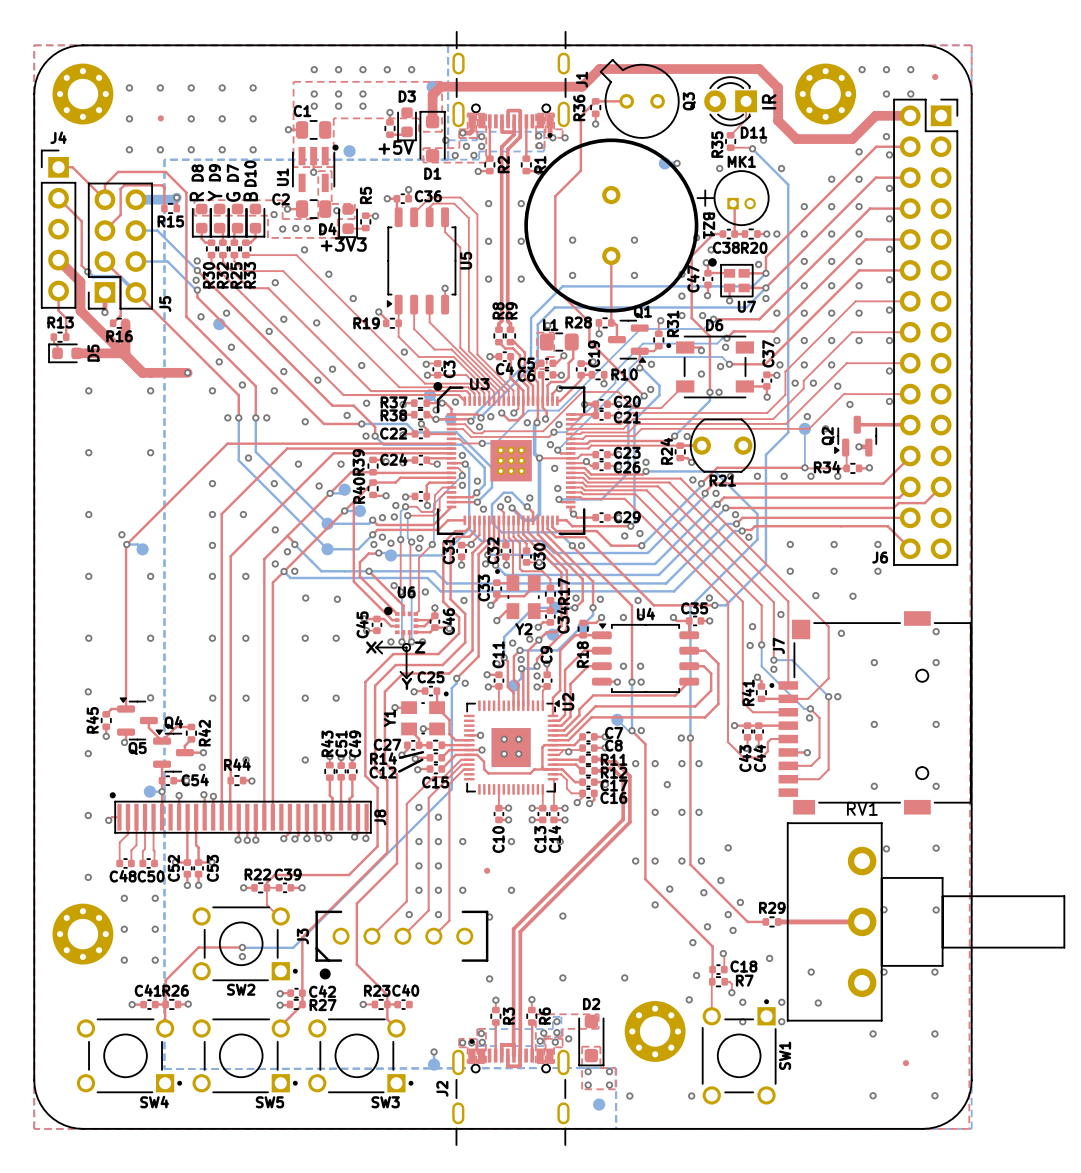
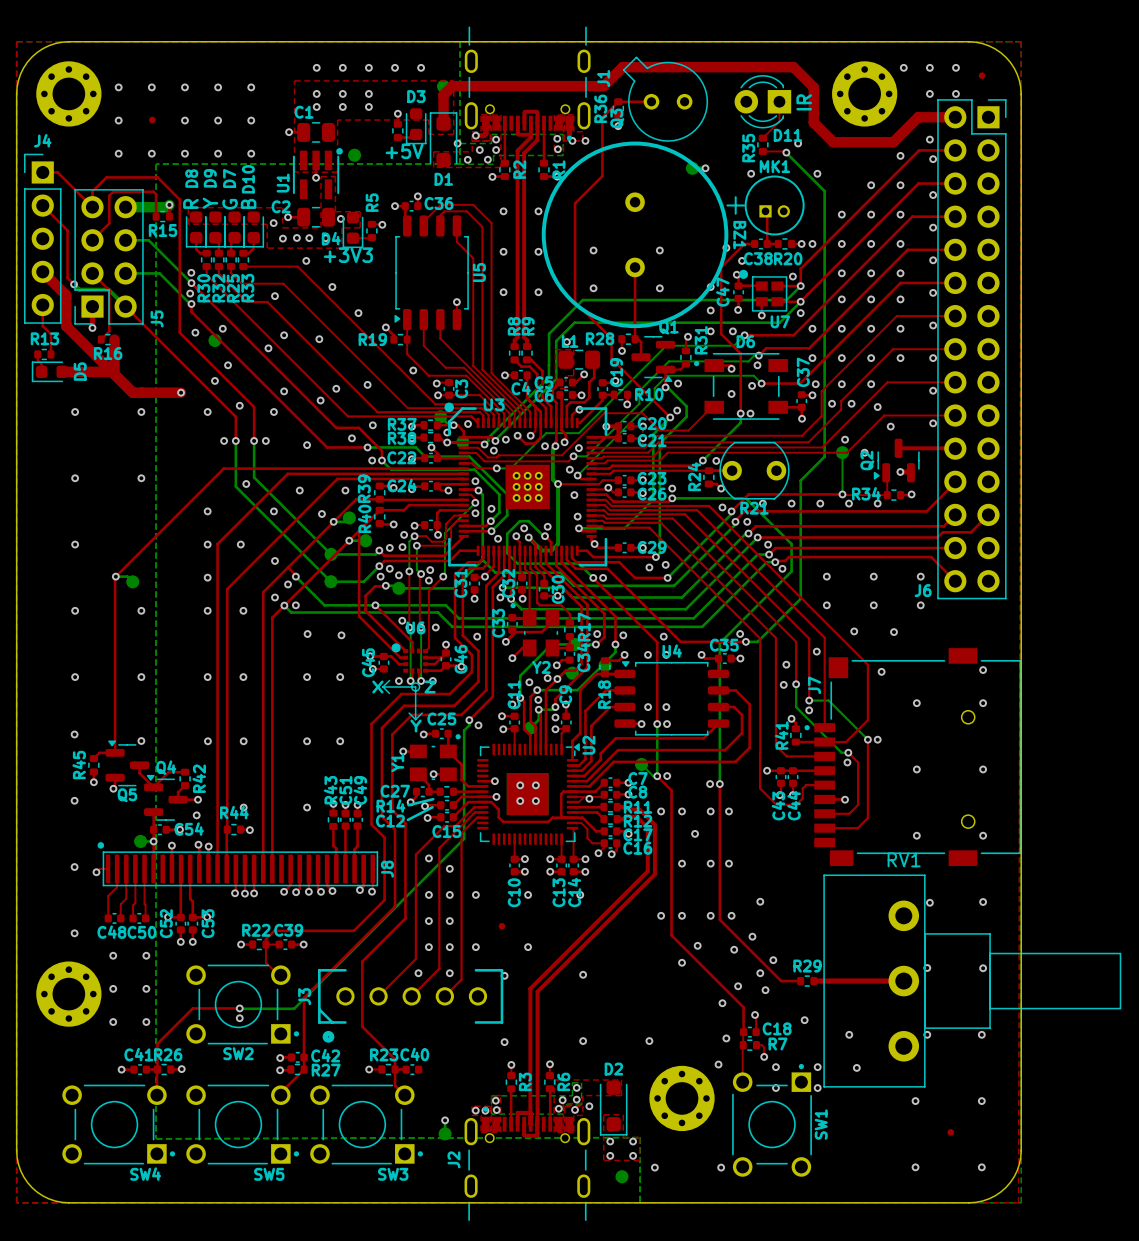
Q3 name position: Q3 (689, 101) -> Q3 (617, 118)
via: (121, 534) -> none

